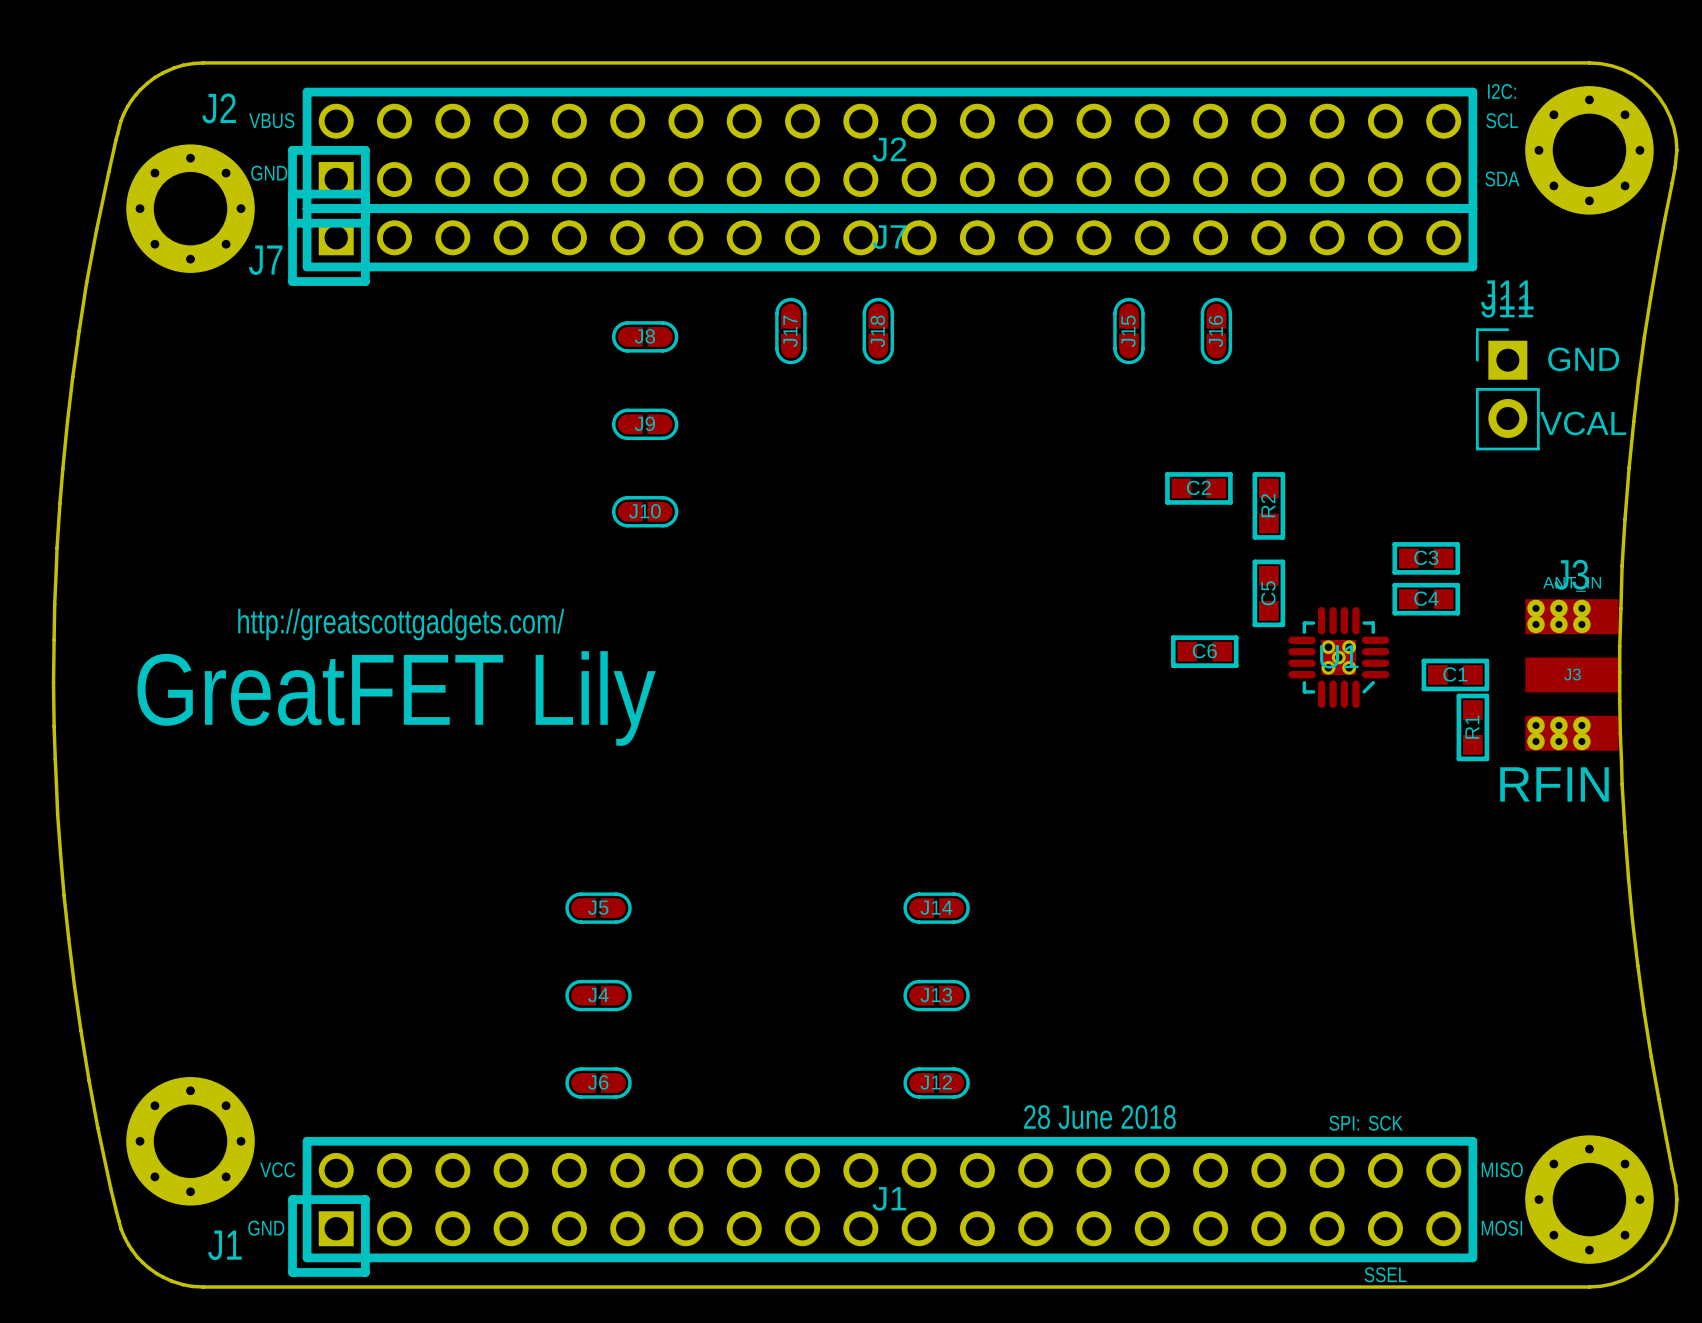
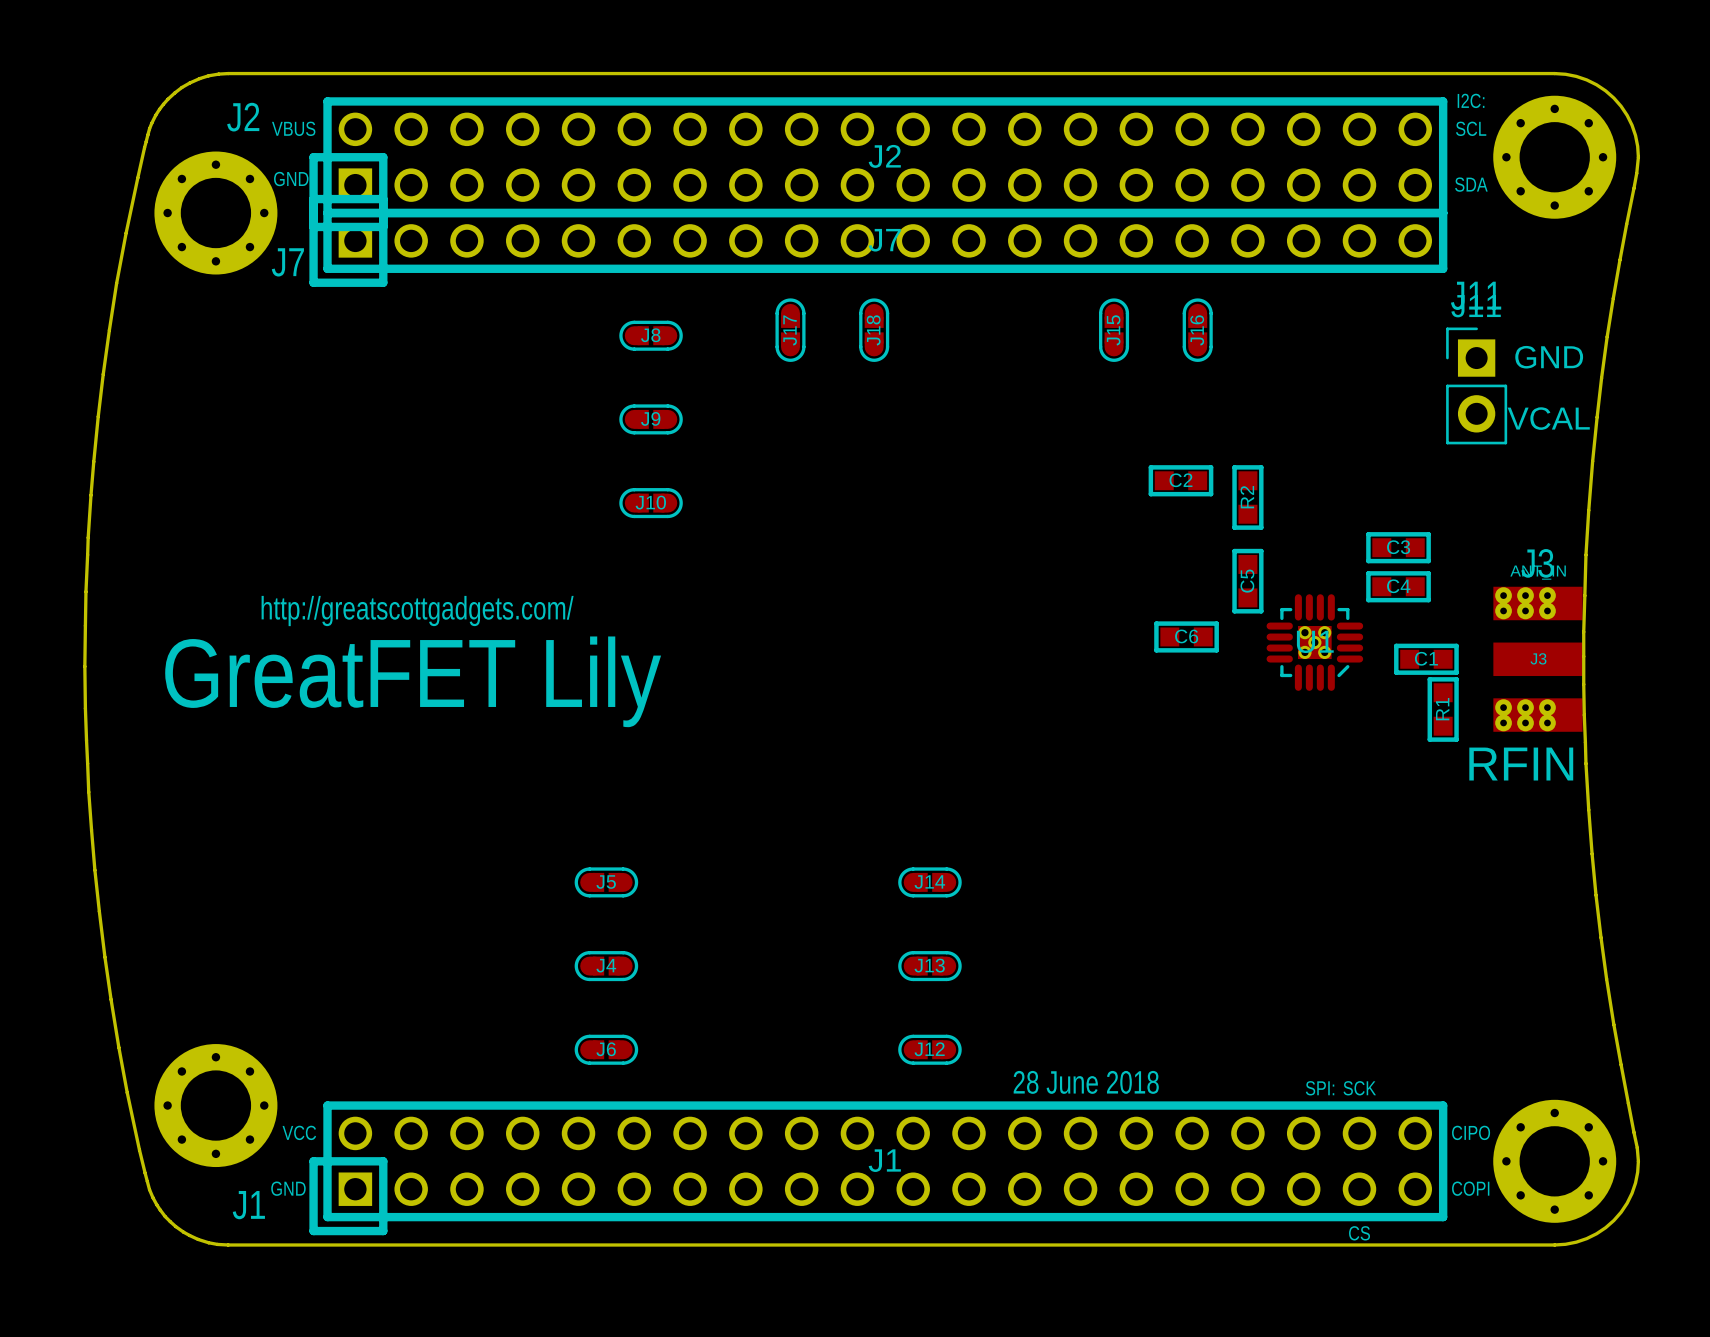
text: MISO (1502, 1169) -> CIPO (1471, 1132)
text: MOSI (1501, 1228) -> COPI (1470, 1188)
text: SSEL (1385, 1274) -> CS (1359, 1233)

